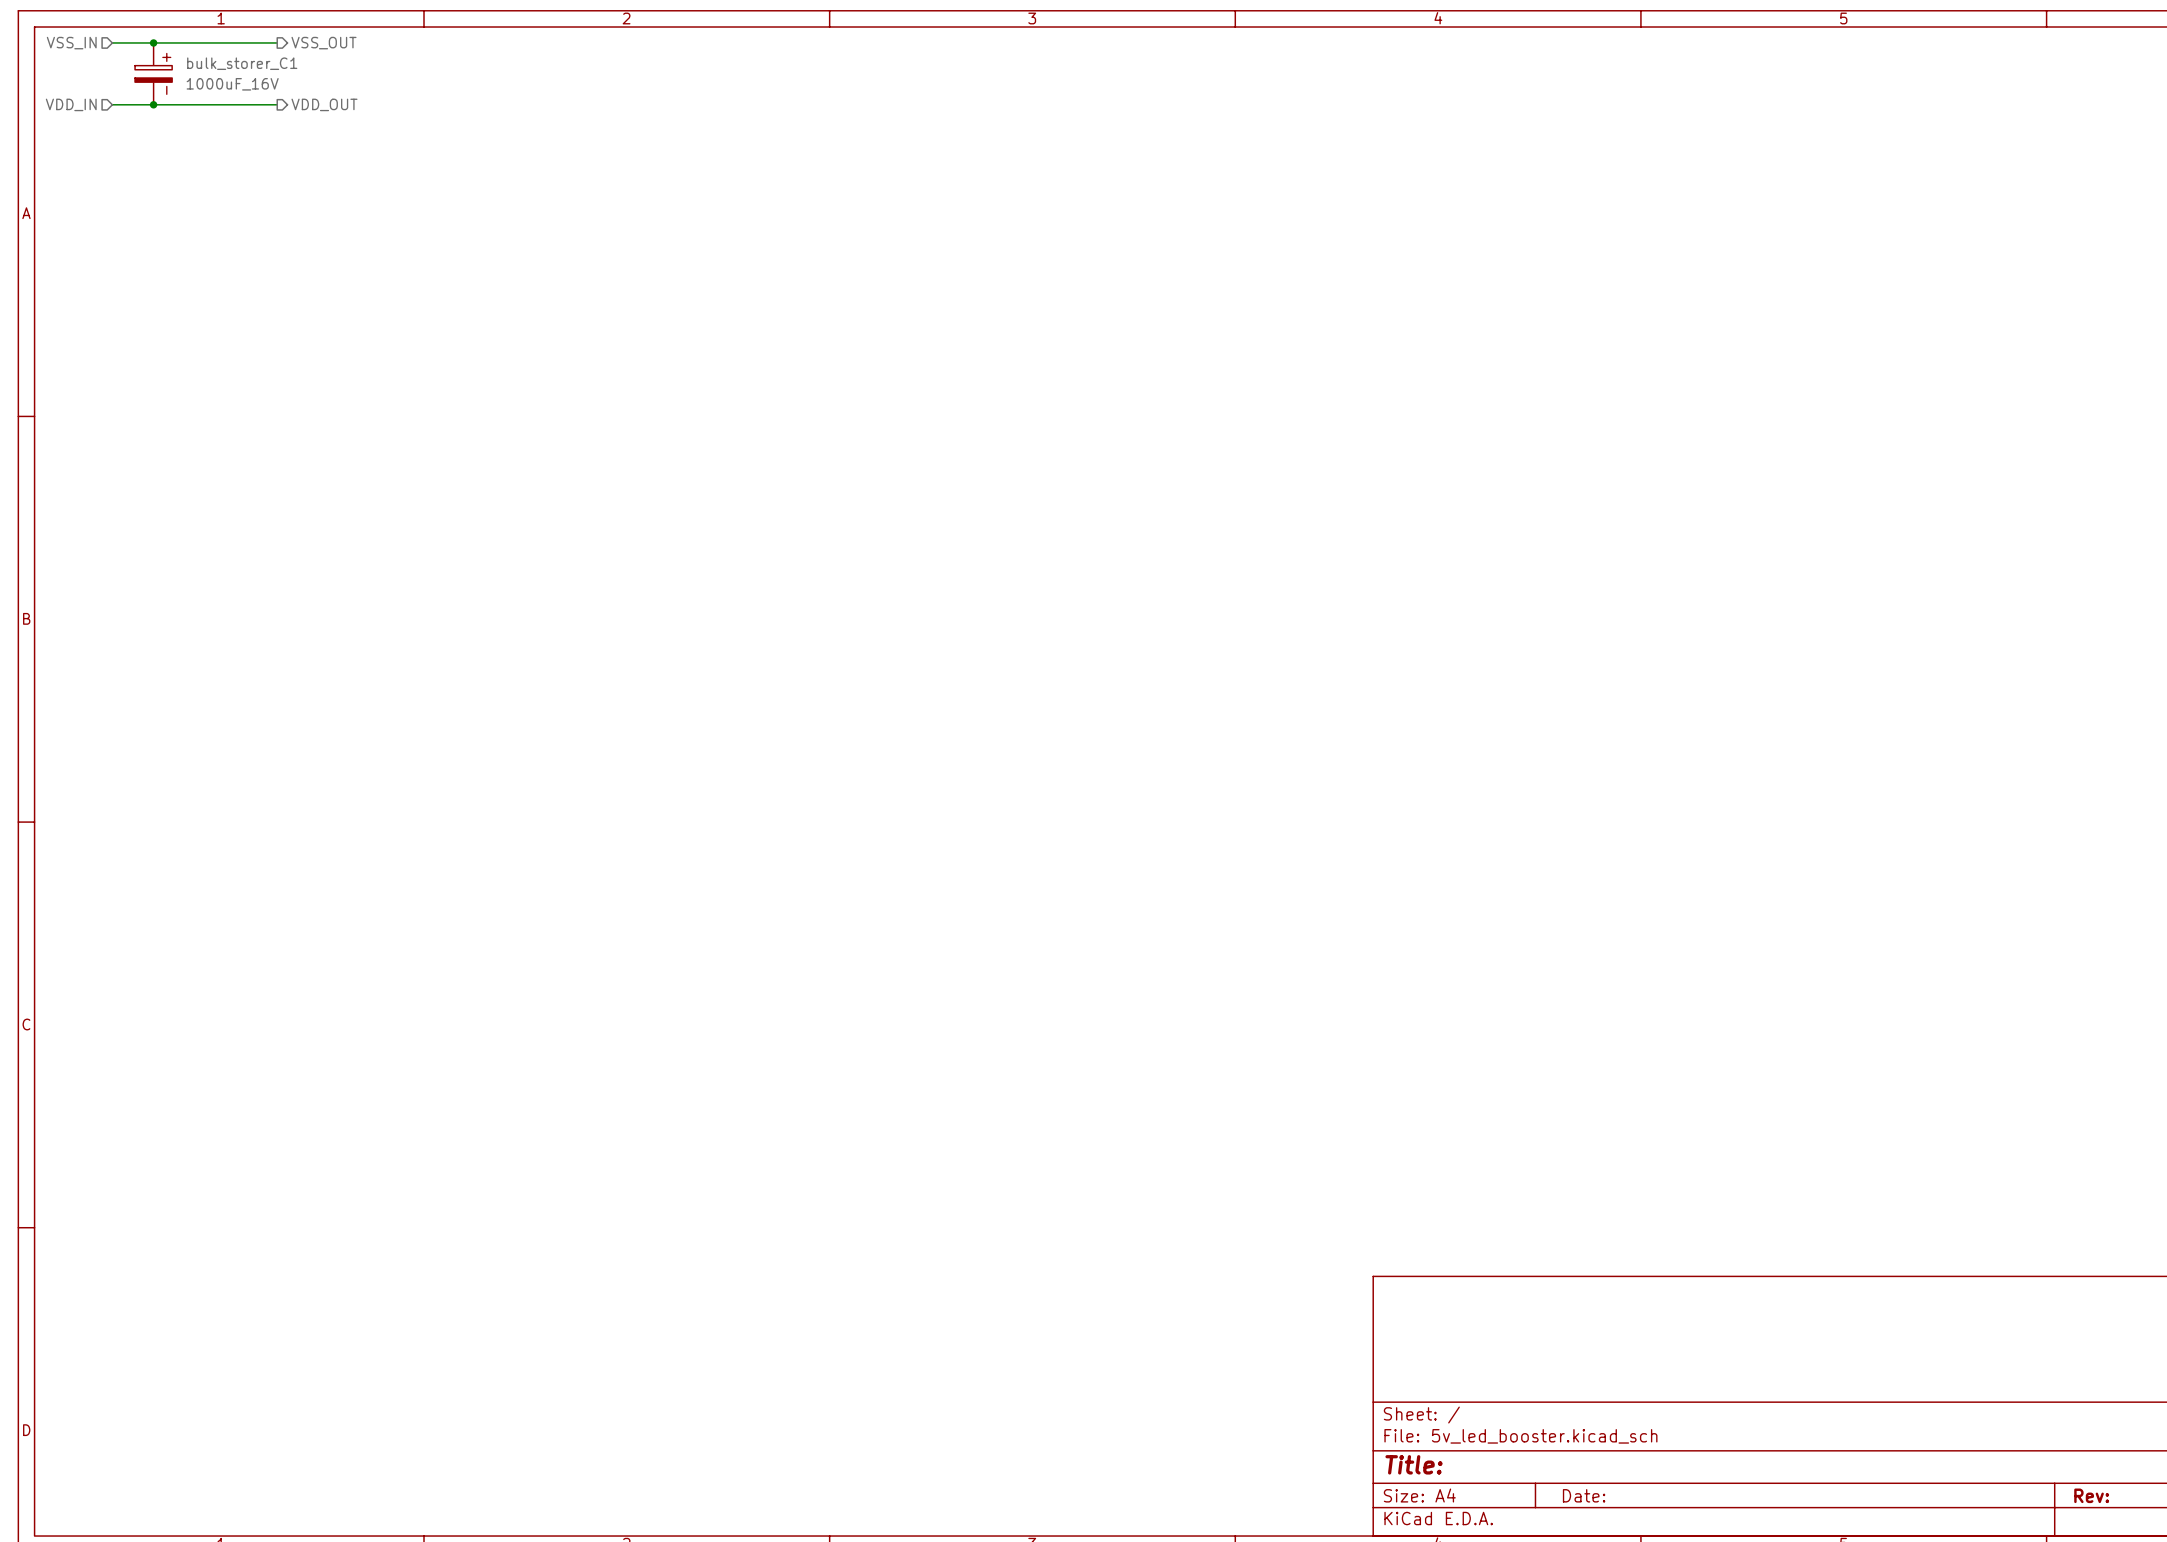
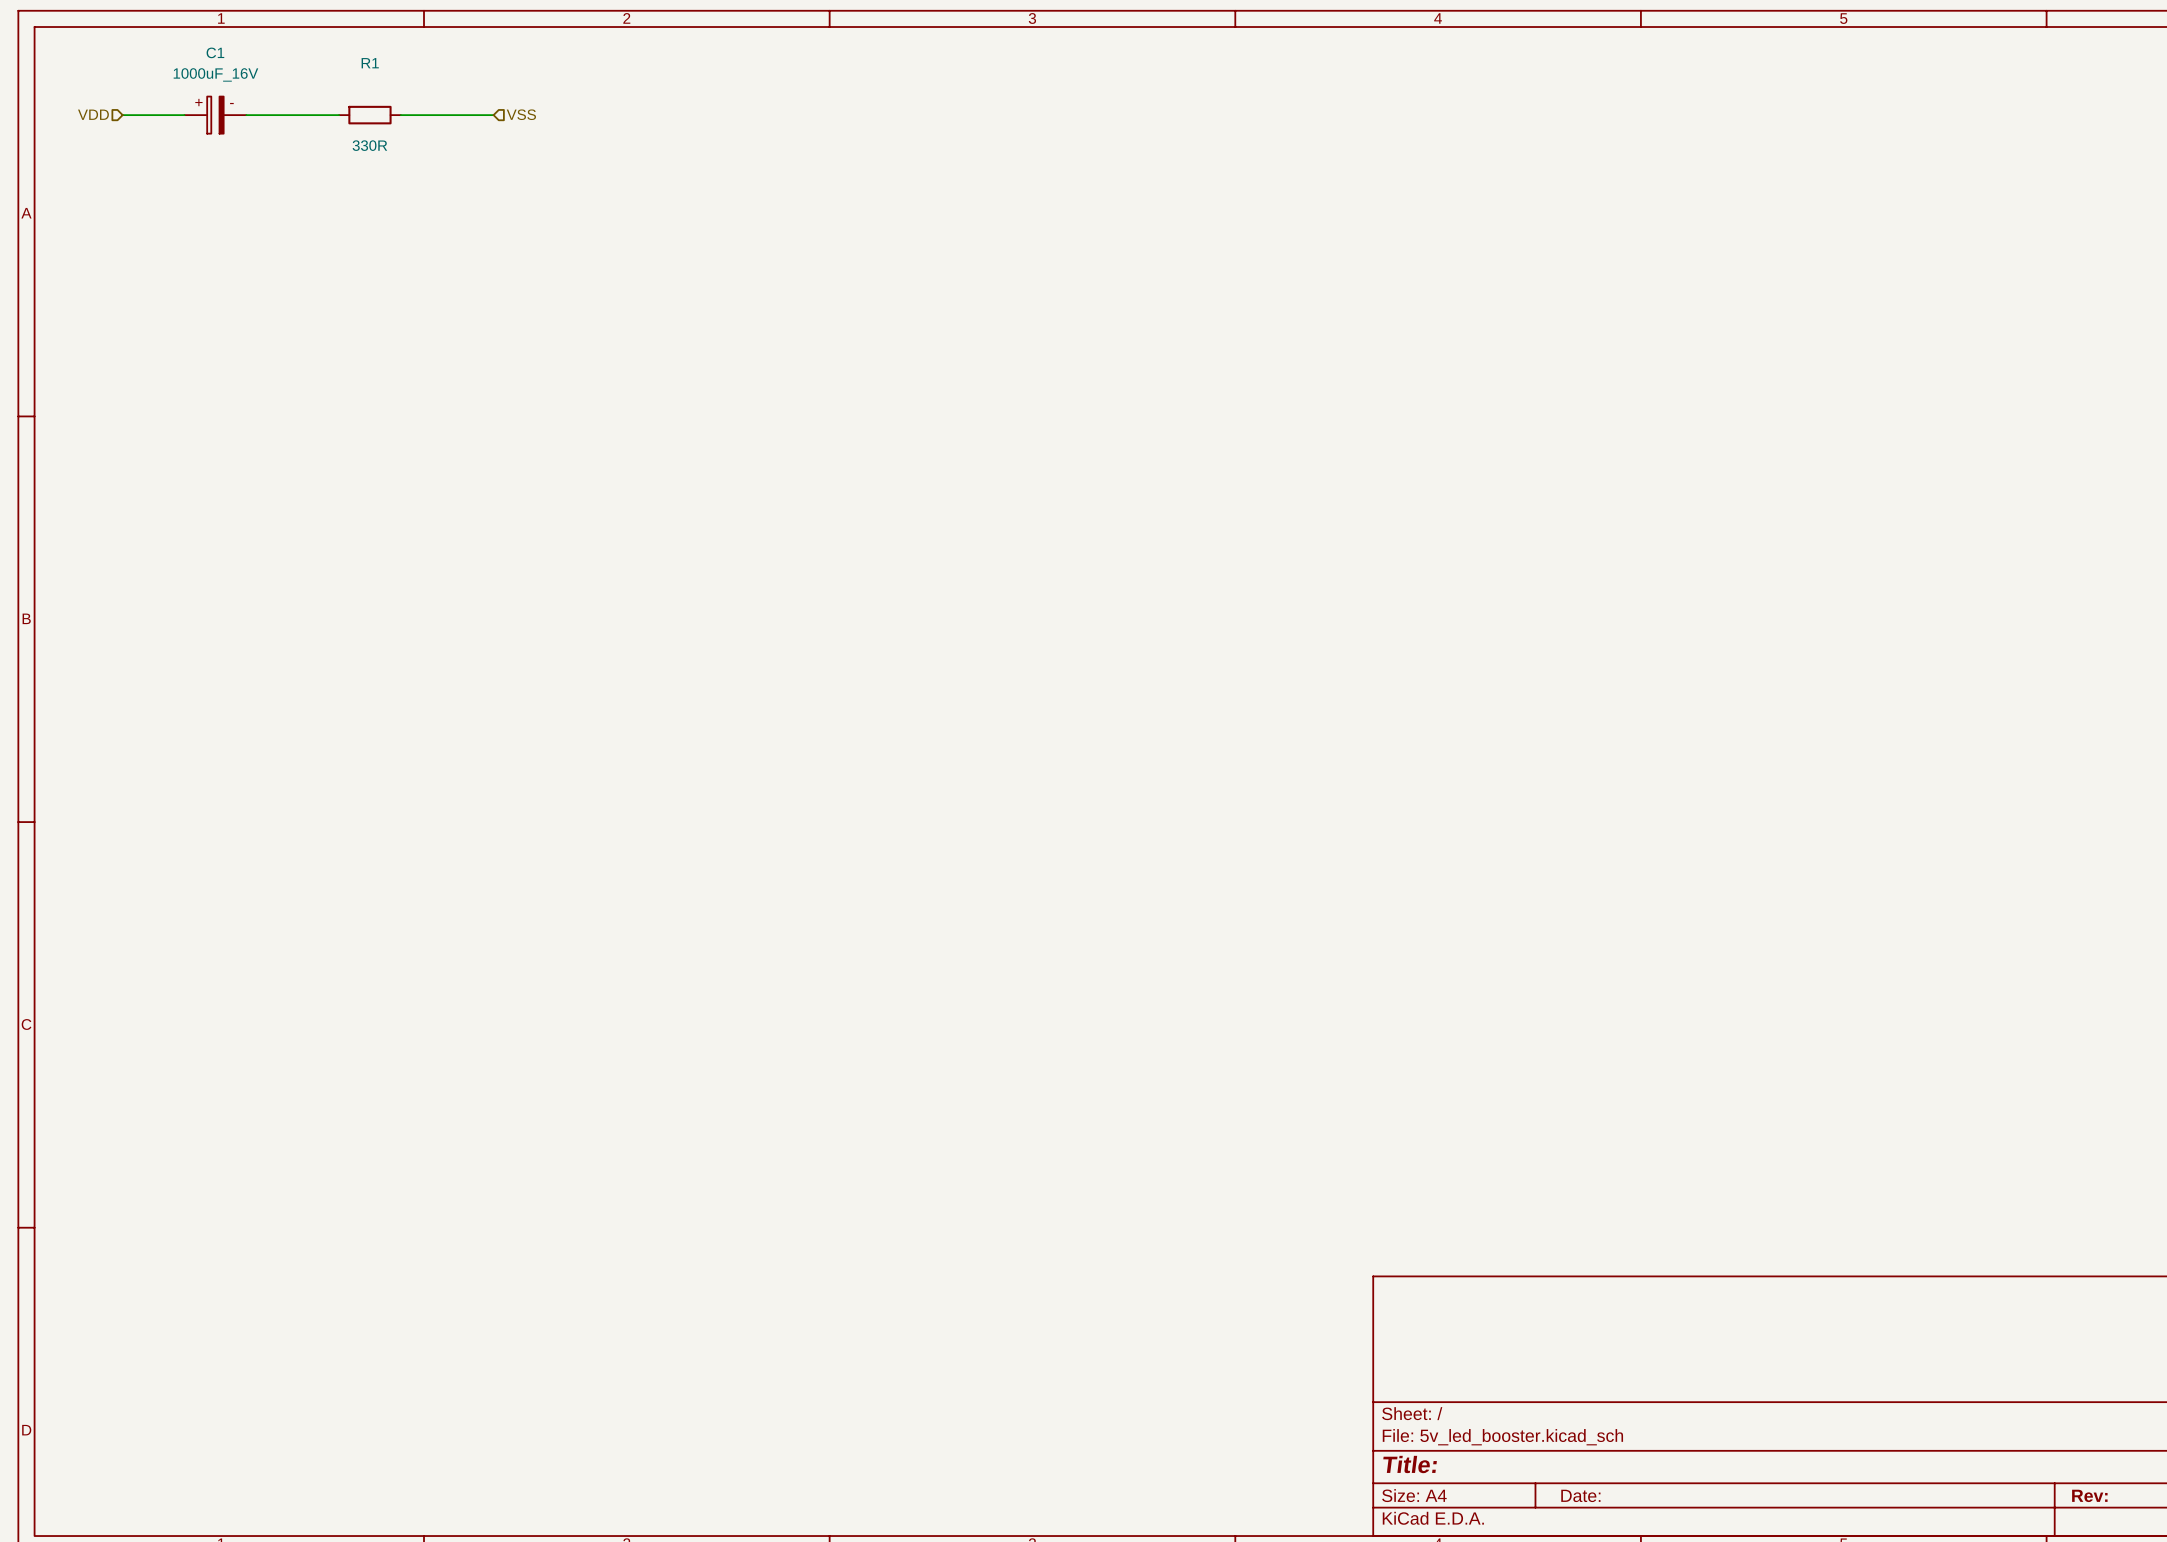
wire: (112, 42) (277, 42) -> none
junction: (153, 42) -> none
hierarchical label: VSS_IN (71, 43) -> none
hierarchical label: VSS_OUT (324, 43) -> none
bulk_storer_C1: 1000uF_16V (153, 73) -> none
hierarchical label: VDD_IN (71, 104) -> VDD (93, 114)
wire: (112, 104) (277, 104) -> none
junction: (153, 104) -> none
hierarchical label: VDD_OUT (324, 104) -> none
hierarchical label: none -> VSS (521, 114)
wire: none -> (122, 115) (184, 115)
C1: none -> 1000uF_16V (215, 115)
wire: none -> (246, 115) (339, 115)
R1: none -> (369, 115)
wire: none -> (400, 115) (493, 115)

